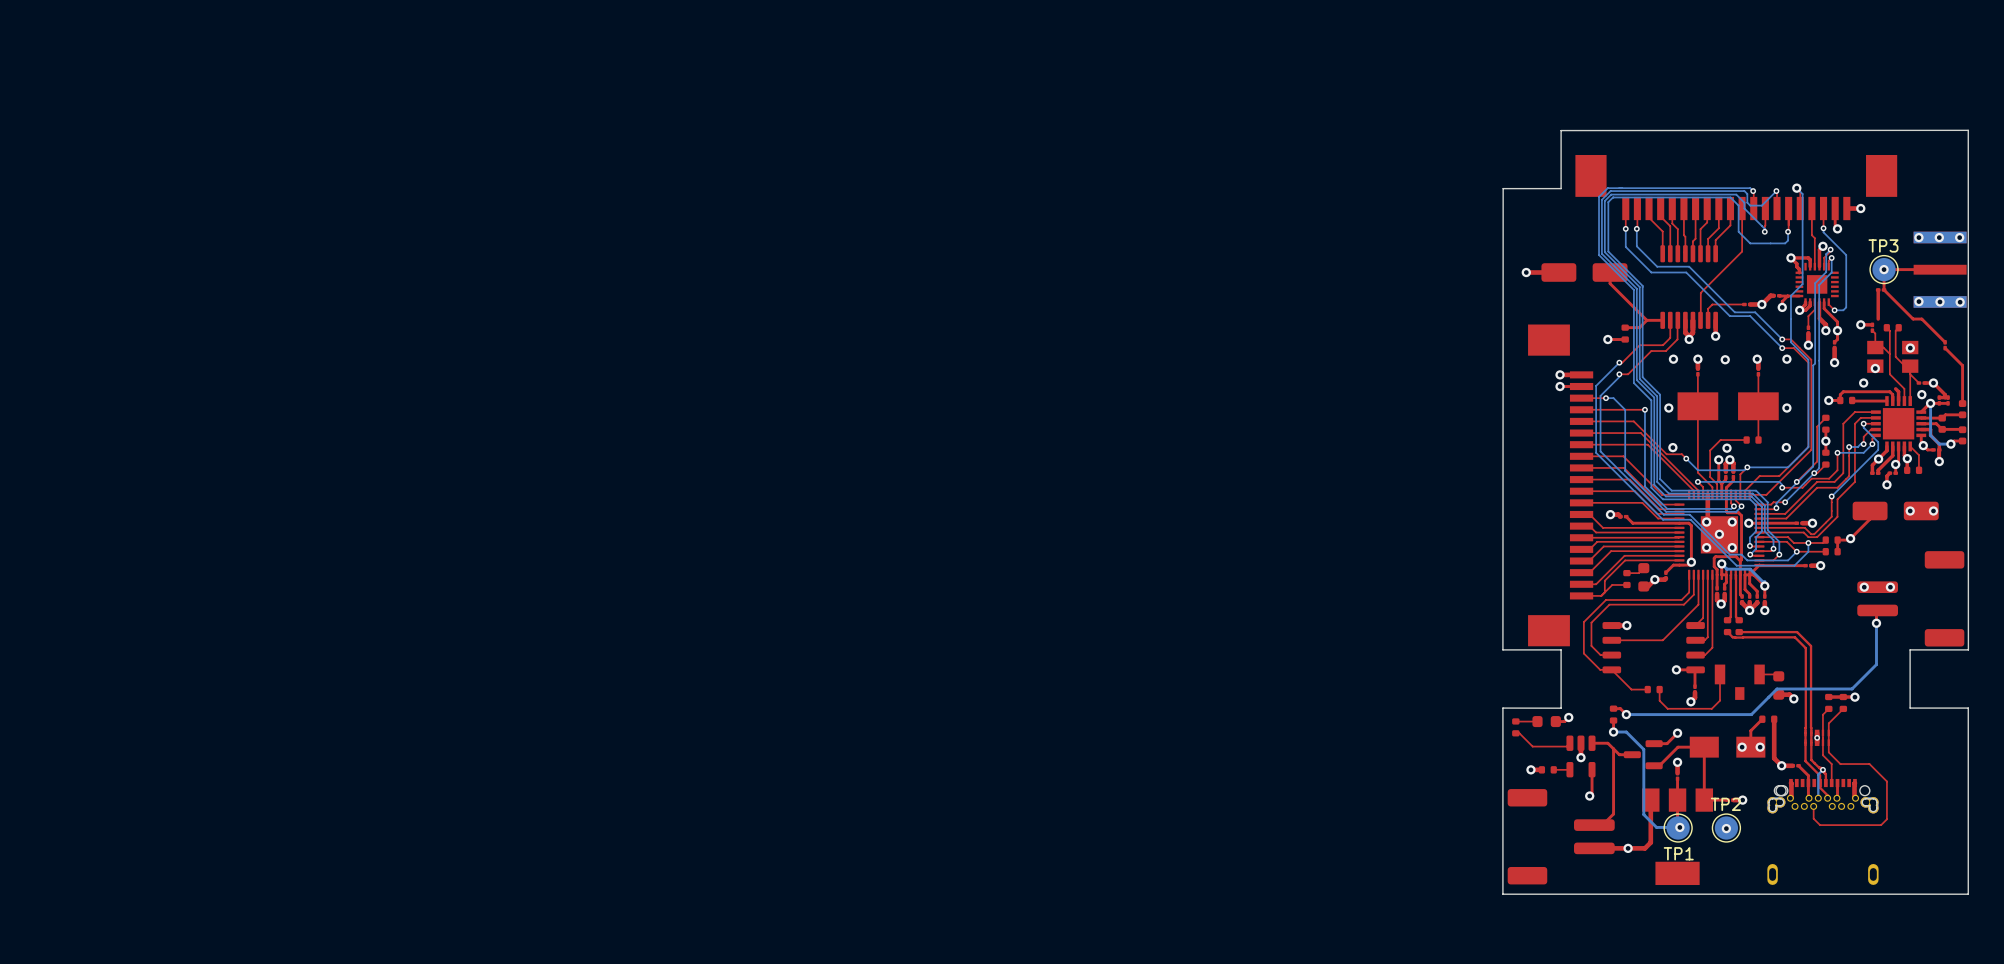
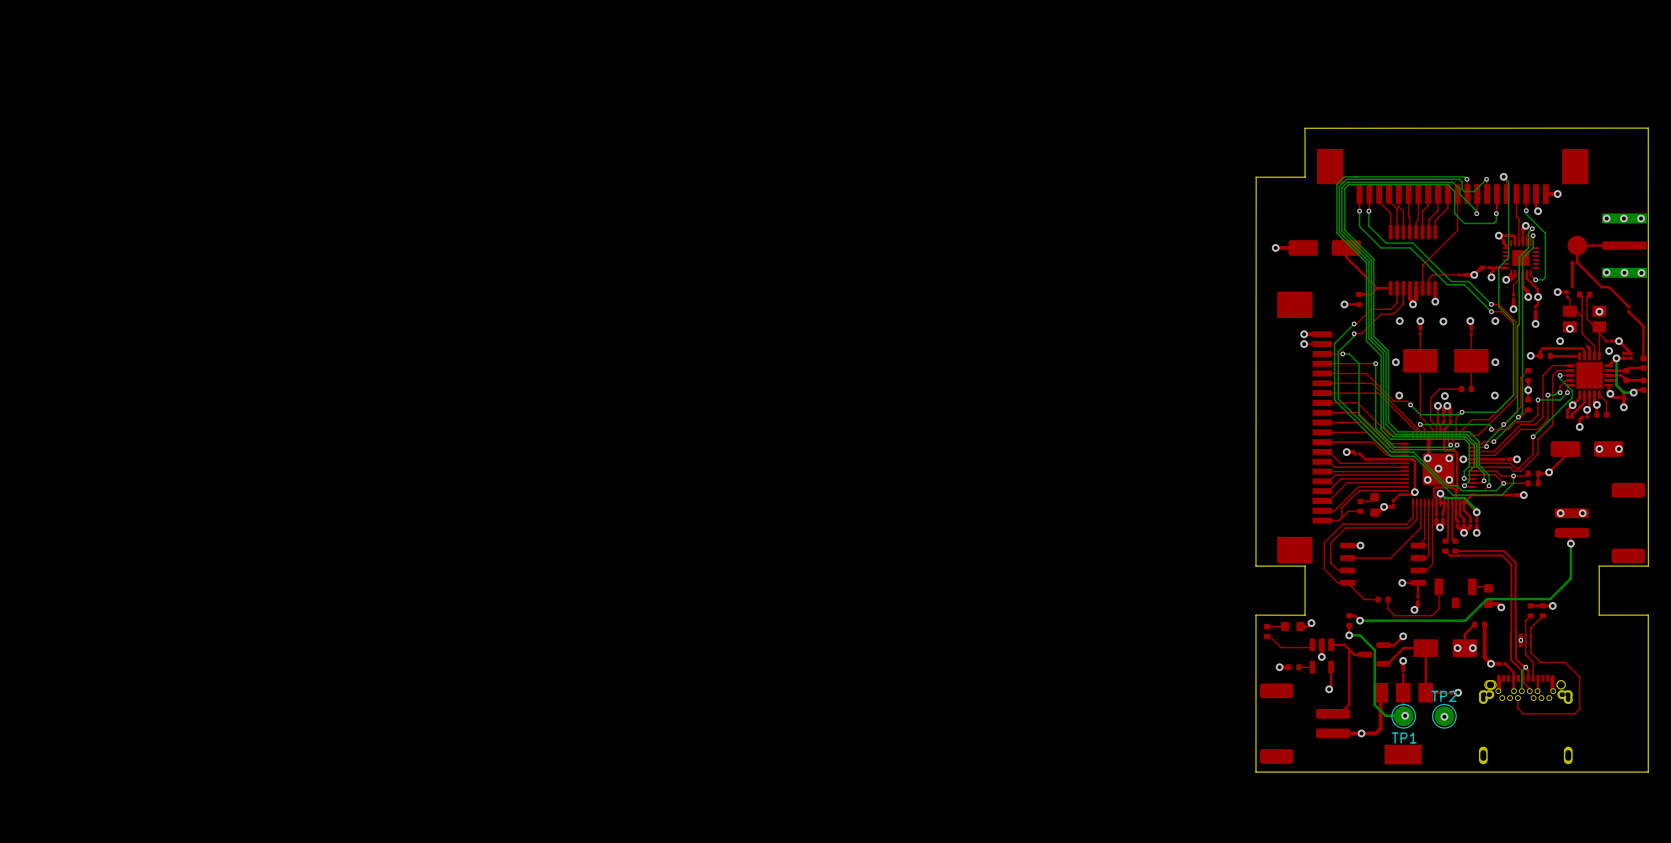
TP3 side: bottom (1884, 269) -> top (1577, 245)
via: (1884, 269) -> none

